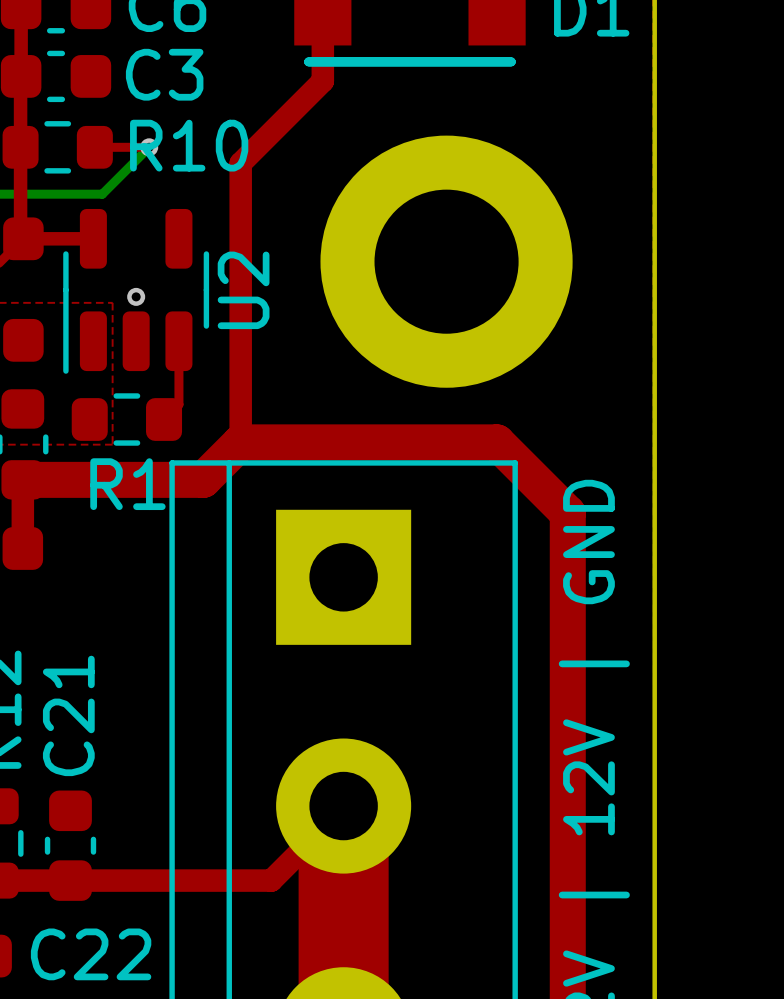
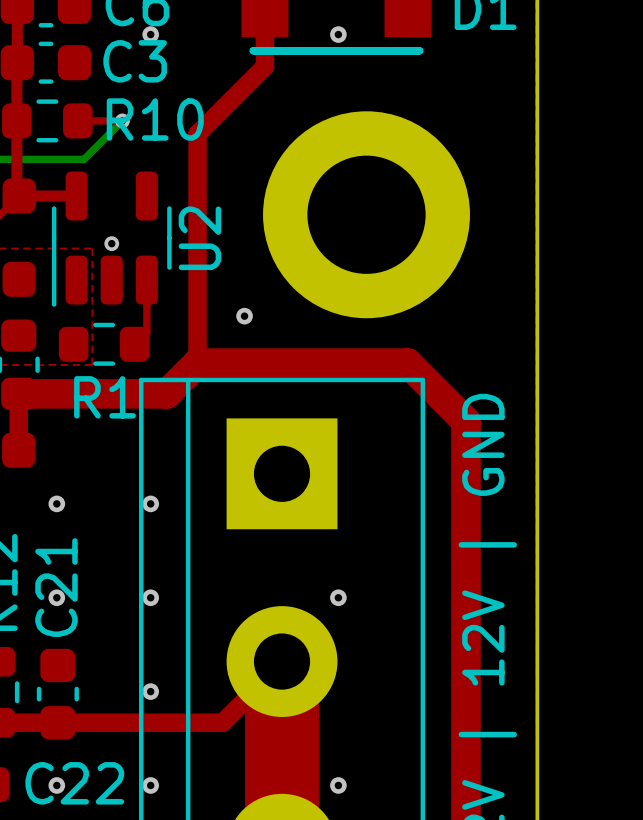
via: none -> (150, 34)
via: none -> (338, 34)
via: none -> (244, 316)
via: none -> (56, 503)
via: none -> (150, 503)
via: none -> (56, 597)
via: none -> (150, 597)
via: none -> (338, 597)
via: none -> (150, 691)
via: none -> (56, 785)
via: none -> (150, 785)
via: none -> (338, 785)

